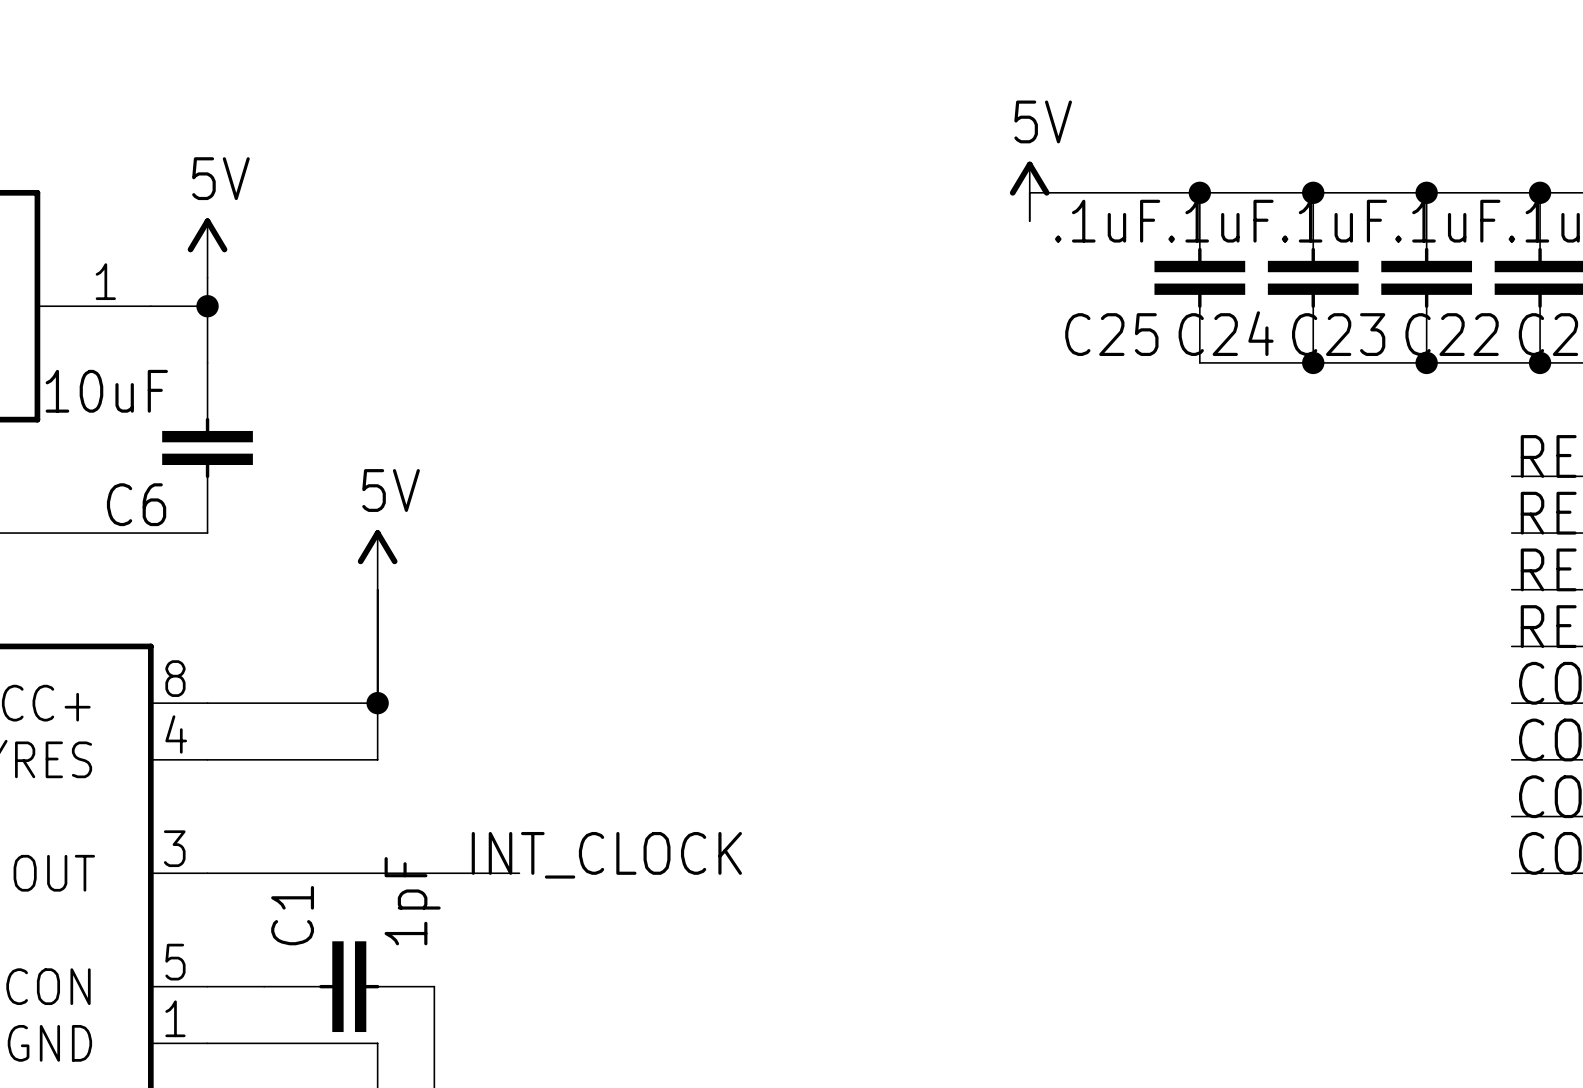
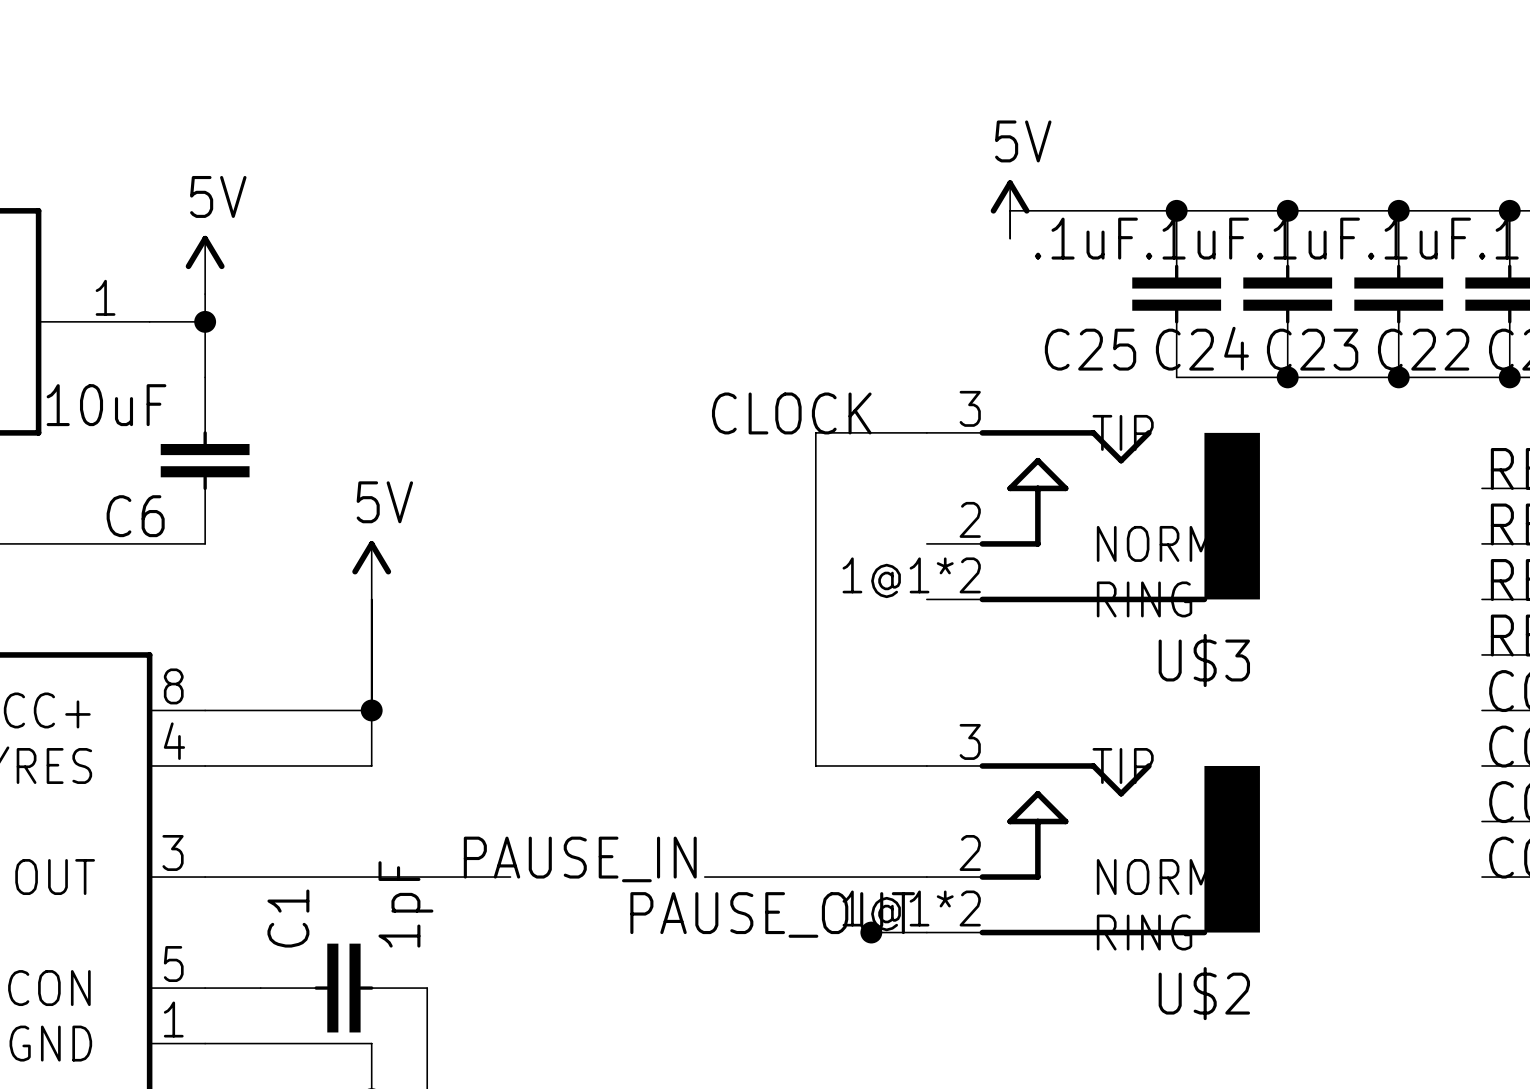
label: none -> CLOCK (791, 413)
wire: none -> (926, 432) (815, 432) (815, 765) (926, 765)
U$3: none -> (1093, 516)
U$2: none -> (1093, 849)
label: INT_CLOCK (606, 855) -> PAUSE_IN (580, 859)
wire: none -> (704, 877) (926, 877)
label: none -> PAUSE_OUT (772, 914)
wire: none -> (871, 932) (926, 932)
junction: none -> (871, 932)

